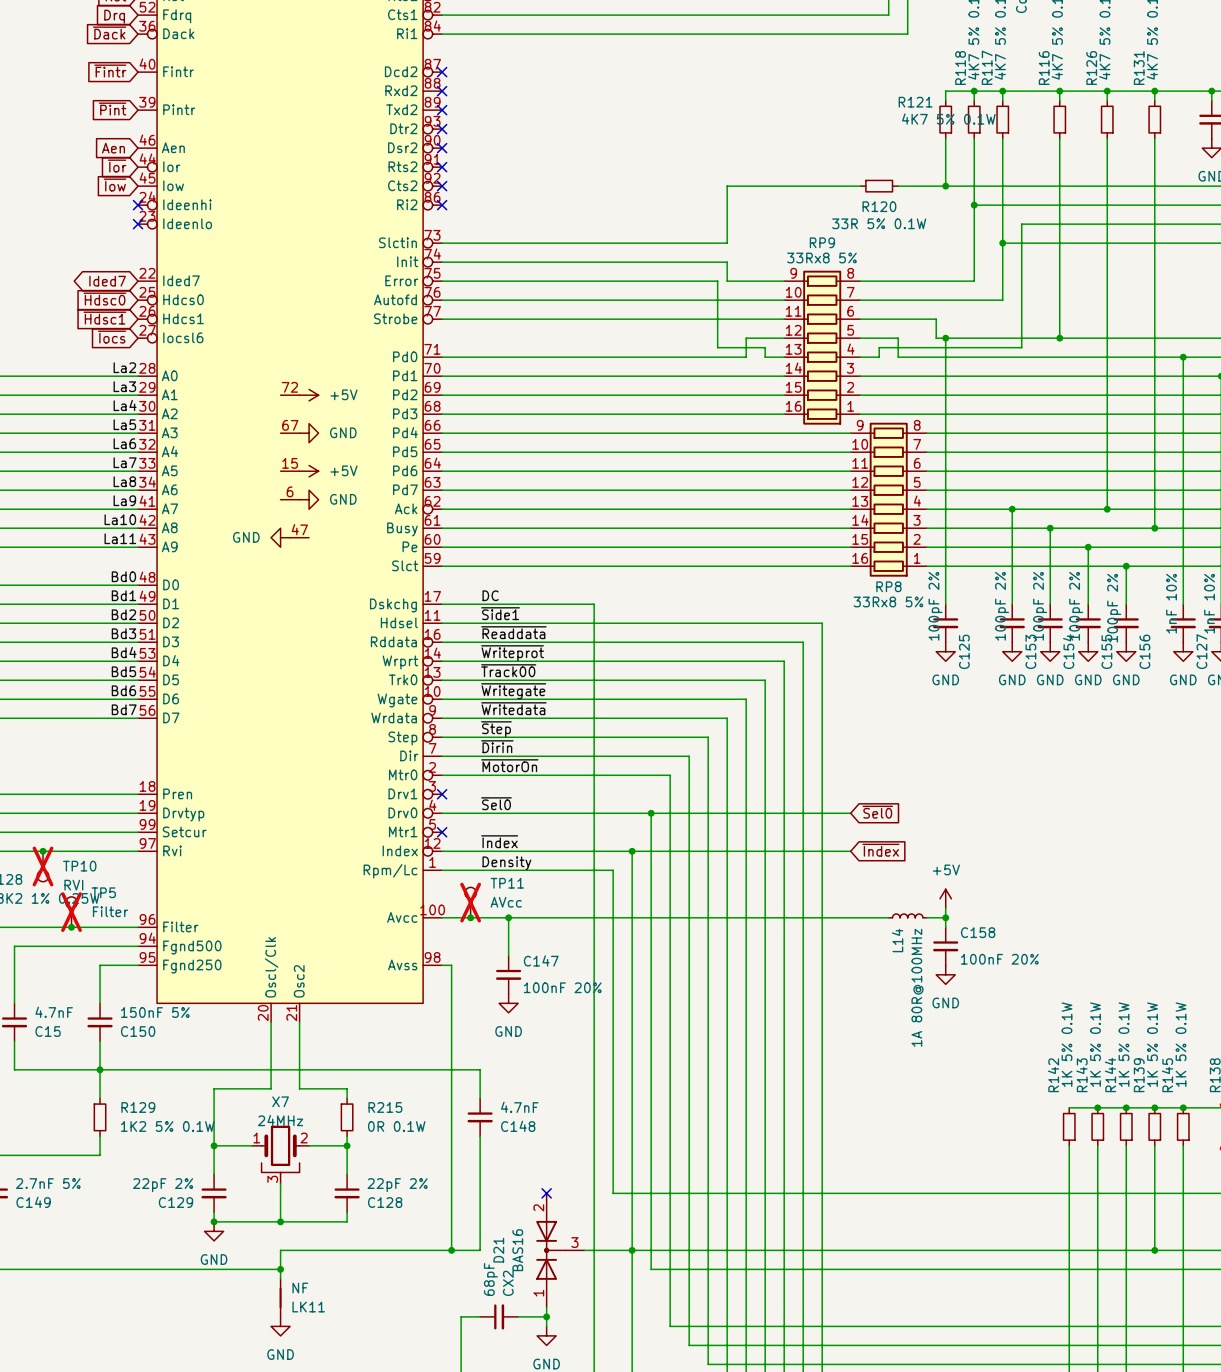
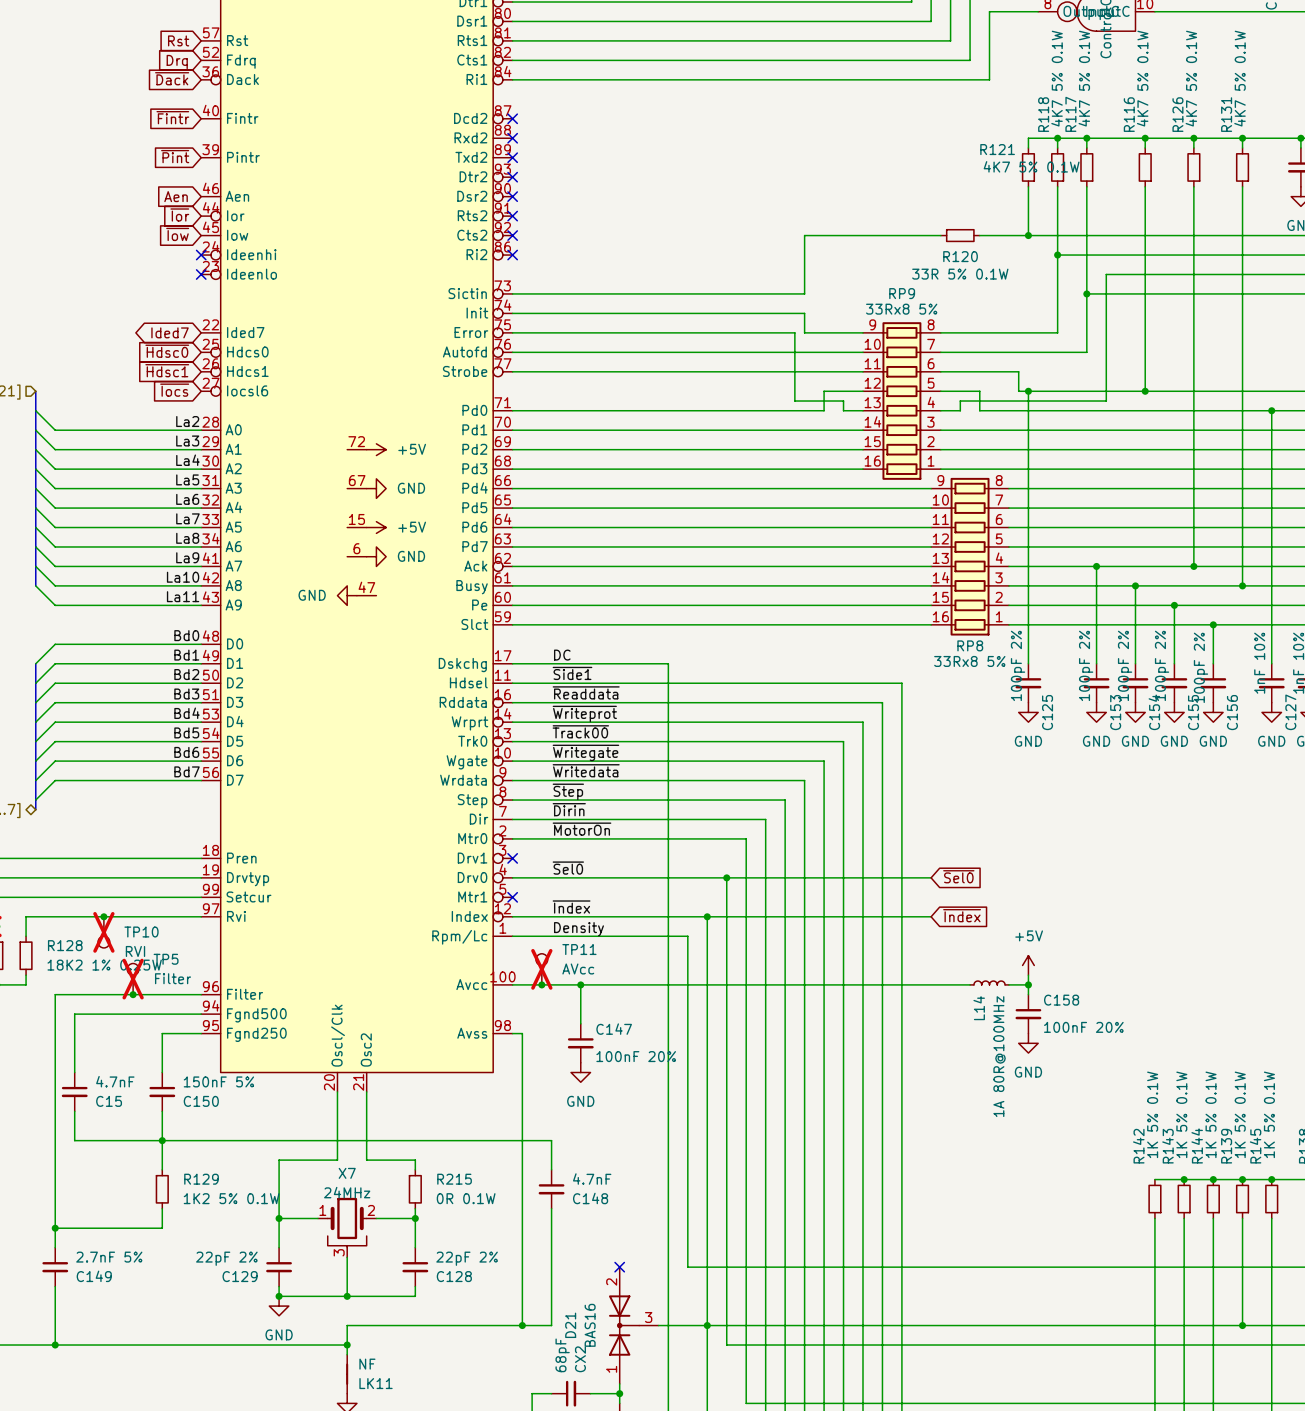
part pin name: Slctin (397, 242) -> Sictin (467, 293)

